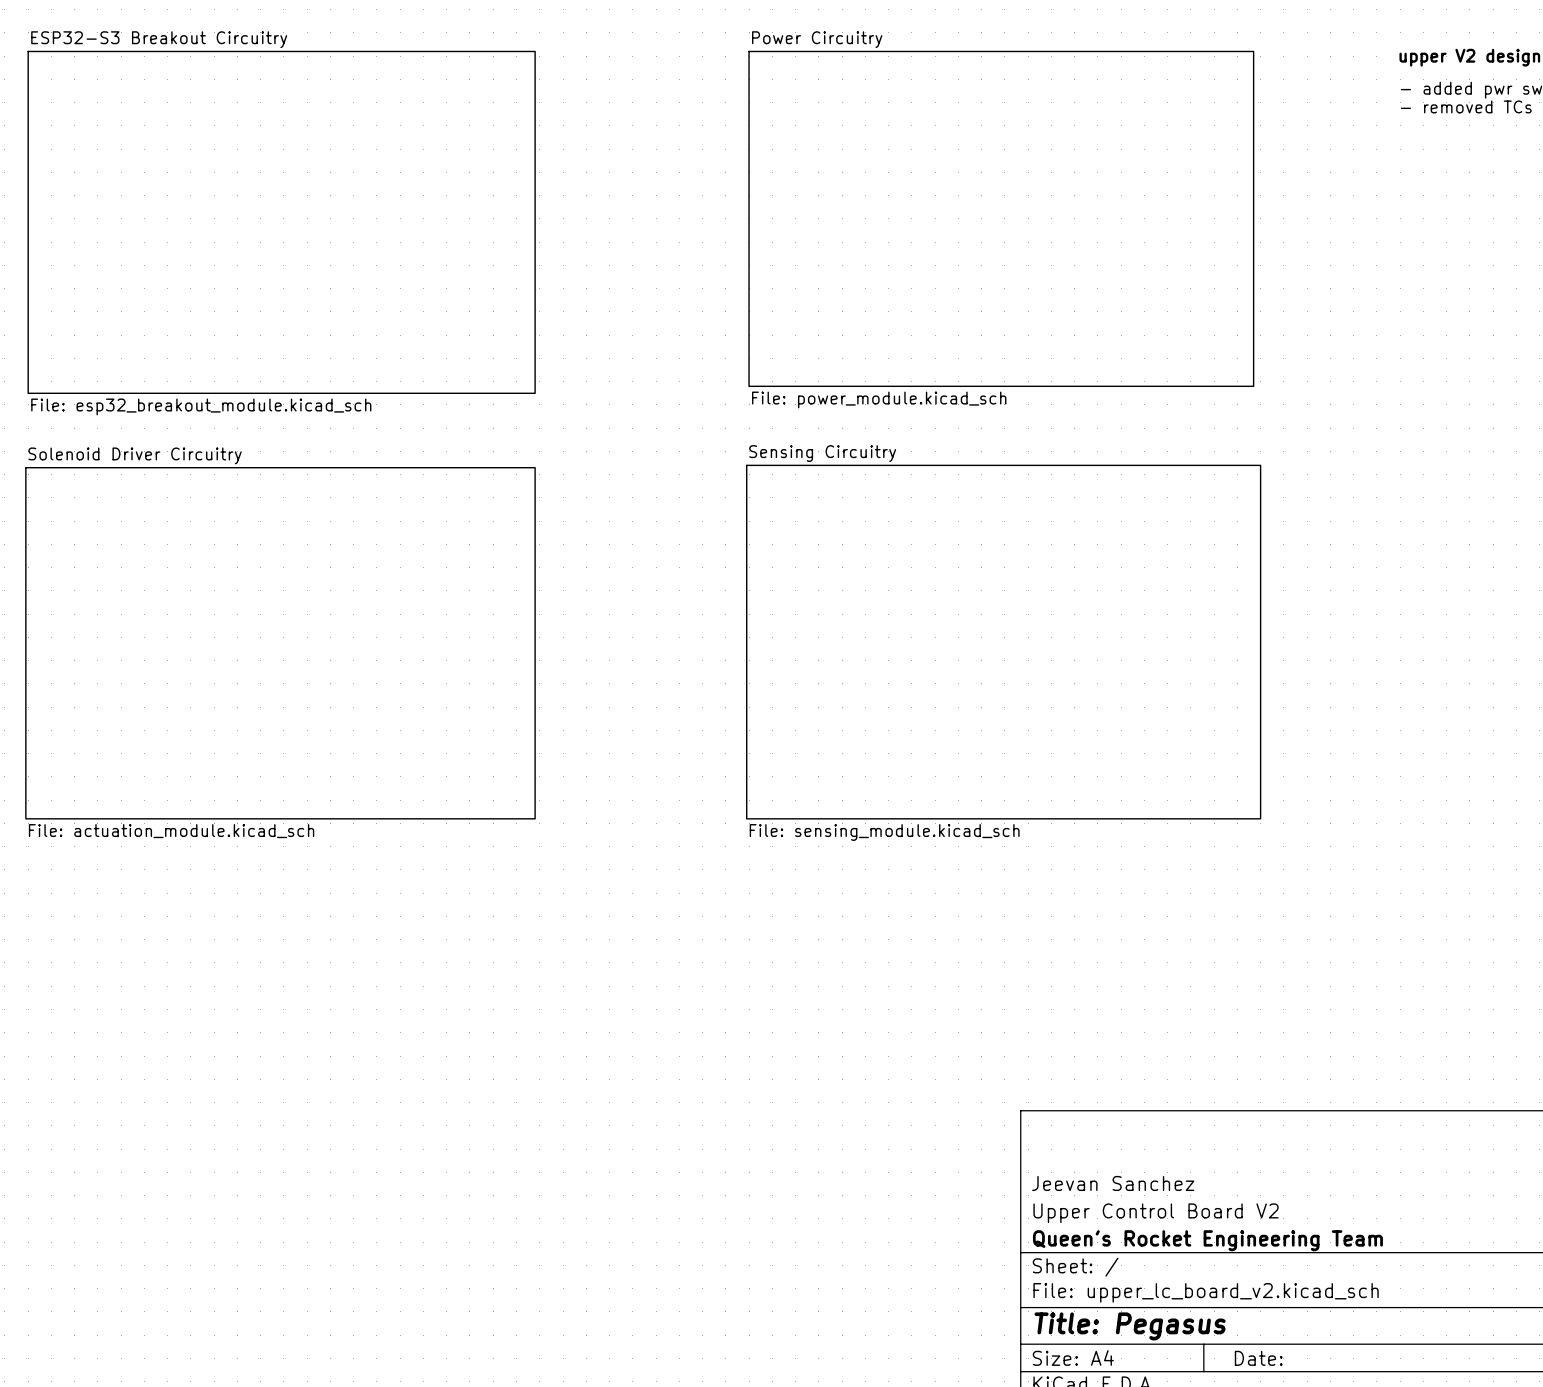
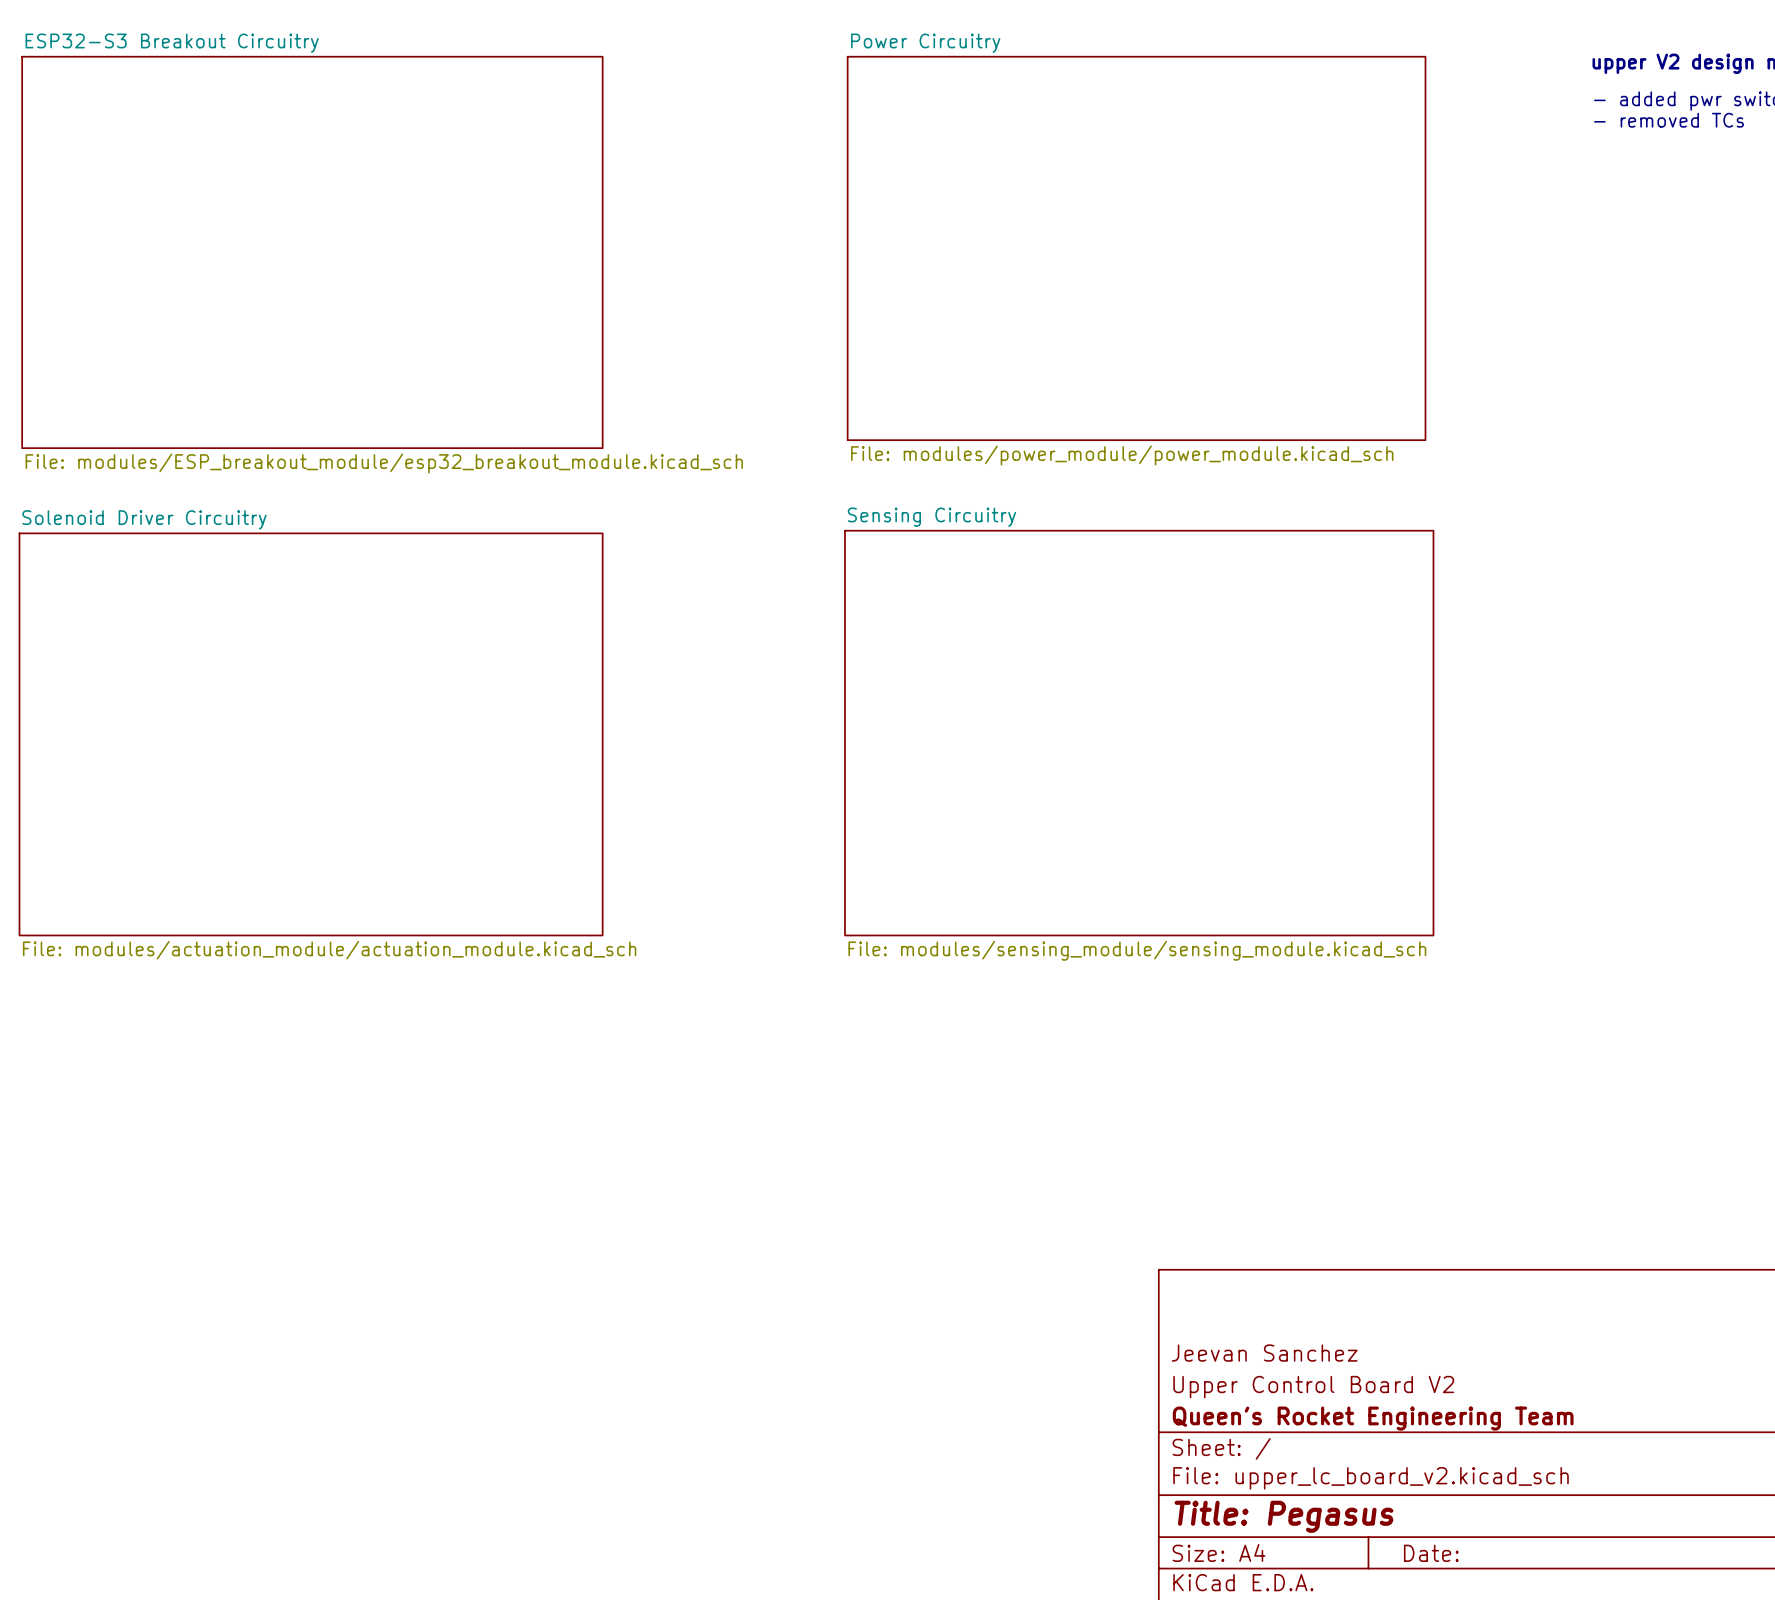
sheet Power Circuitry value: File: power_module.kicad_sch (879, 399) -> File: modules/power_module/power_module.kicad_sch (1122, 455)
sheet ESP32-S3 Breakout Circuitry value: File: esp32_breakout_module.kicad_sch (201, 406) -> File: modules/ESP_breakout_module/esp32_breakout_module.kicad_sch (384, 463)
sheet Solenoid Driver Circuitry value: File: actuation_module.kicad_sch (171, 831) -> File: modules/actuation_module/actuation_module.kicad_sch (329, 950)
sheet Sensing Circuitry value: File: sensing_module.kicad_sch (884, 832) -> File: modules/sensing_module/sensing_module.kicad_sch (1137, 950)

